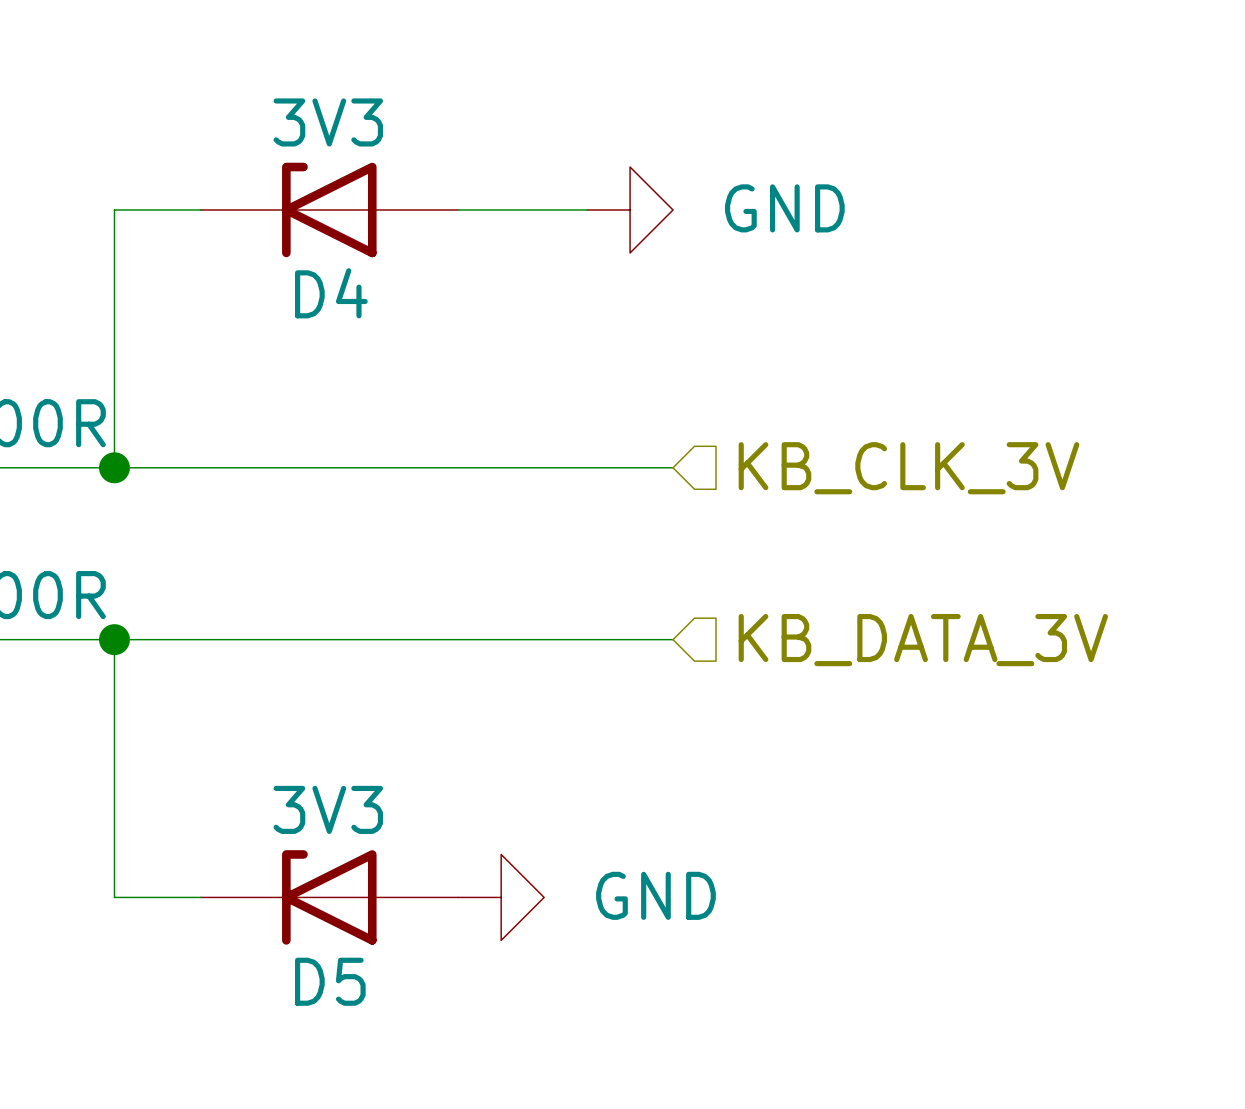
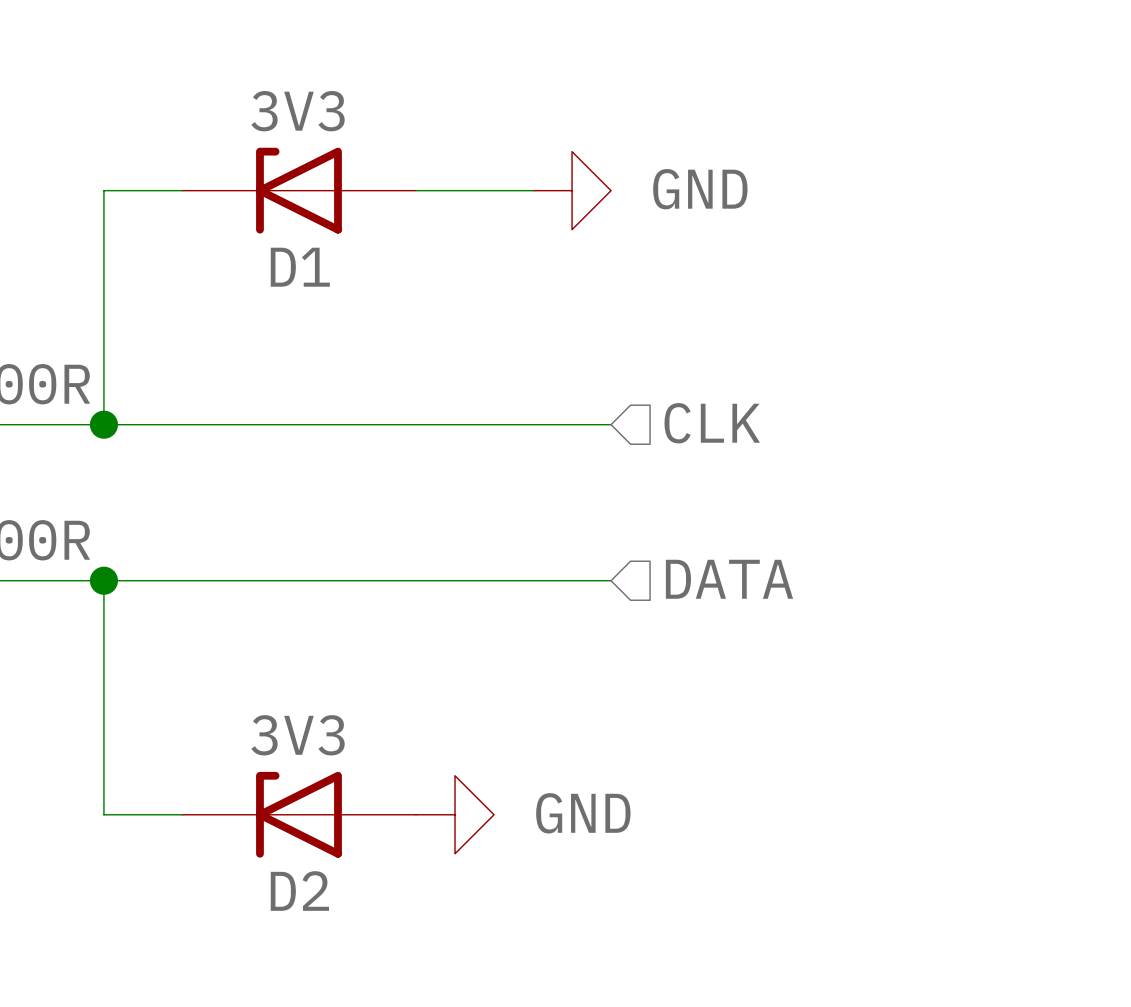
D4 name: D4 (331, 293) -> D1 (300, 267)
hierarchical label: KB_CLK_3V (908, 468) -> CLK (712, 423)
hierarchical label: KB_DATA_3V (923, 640) -> DATA (729, 579)
D5 name: D5 (330, 981) -> D2 (299, 890)

